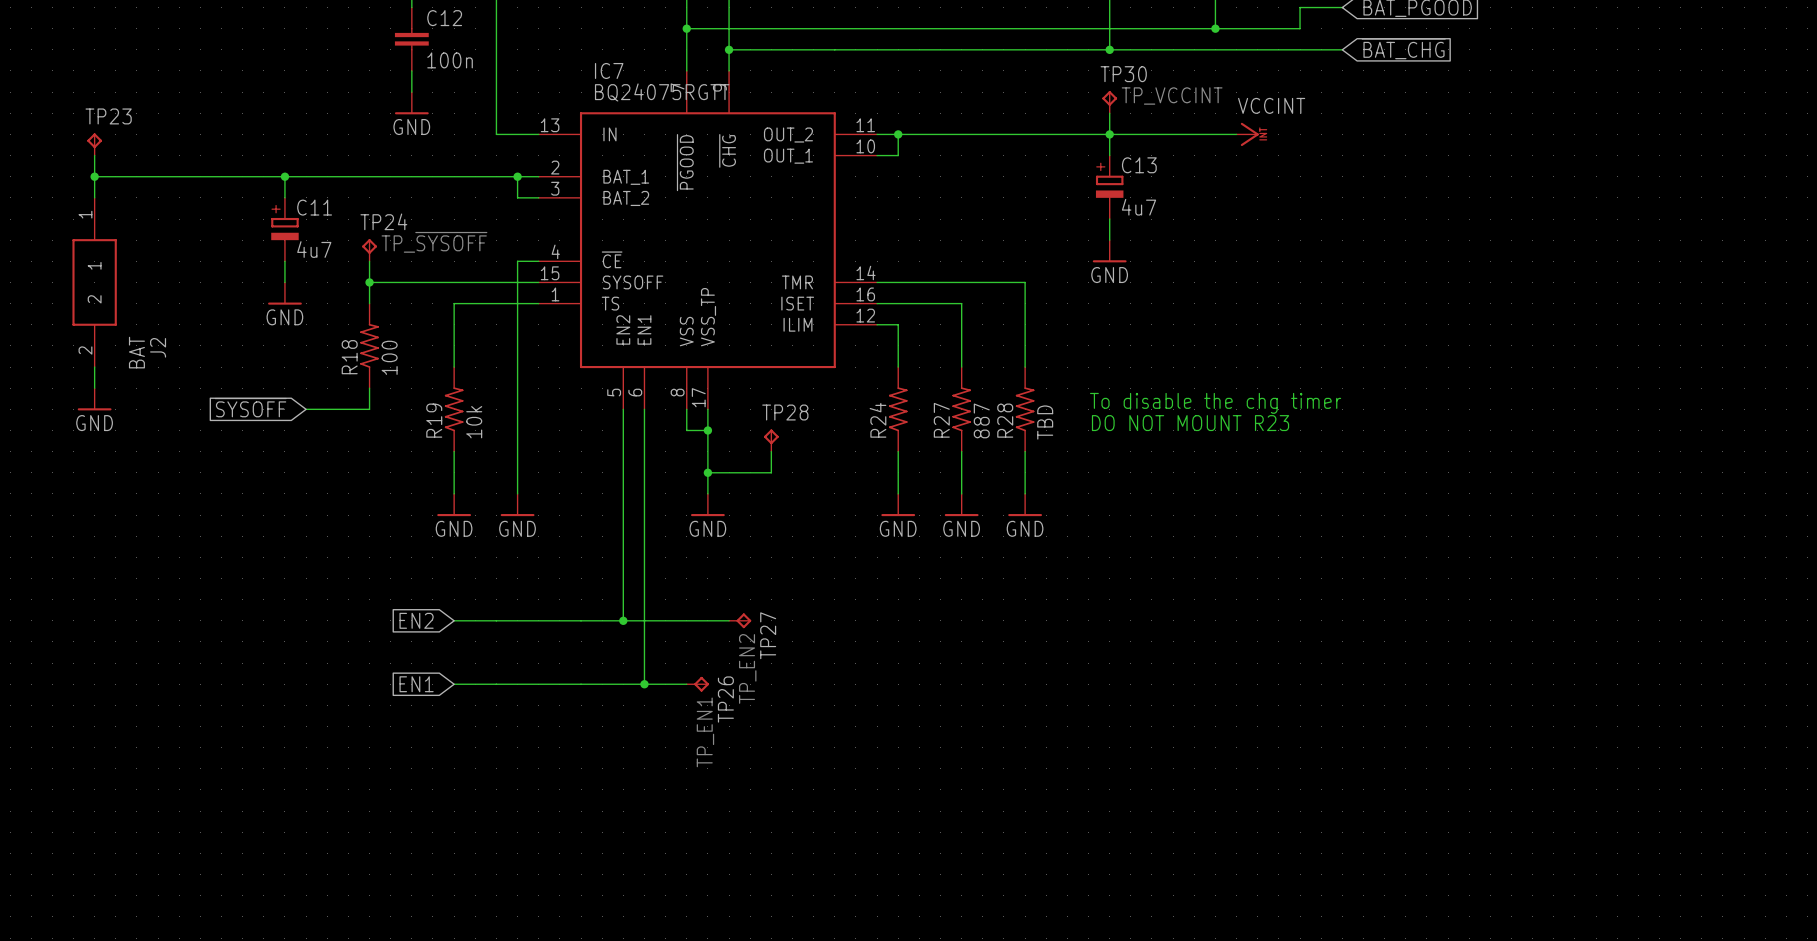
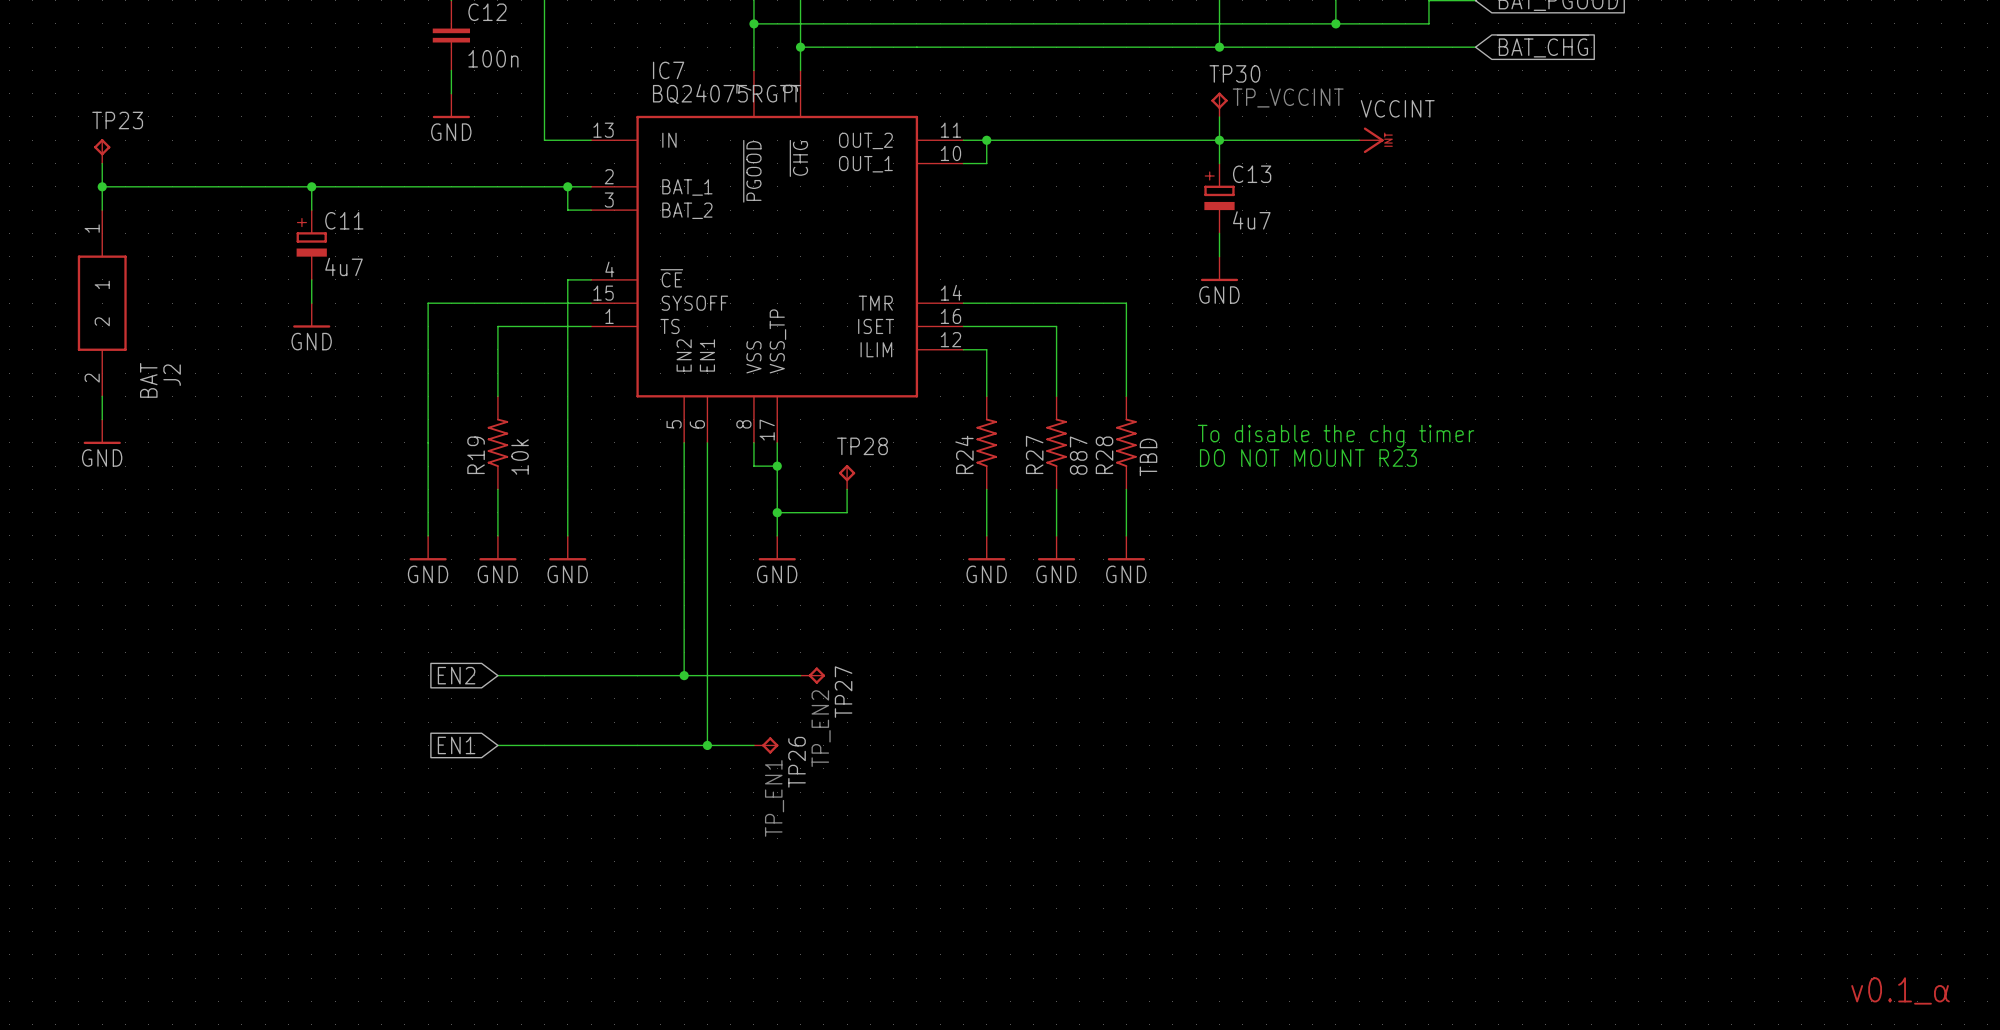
TP24: (369, 250) -> none
wire: (369, 261) (369, 303) -> none
wire: (369, 282) (390, 282) -> (428, 535) (428, 303)
junction: (369, 282) -> none
R18: 100 (369, 345) -> none
wire: (369, 388) (369, 409) (306, 409) -> none
global label: ~{SYSOFF} (250, 407) -> none
power symbol: none -> GND (428, 548)
text: none -> v0.1_α (1900, 990)

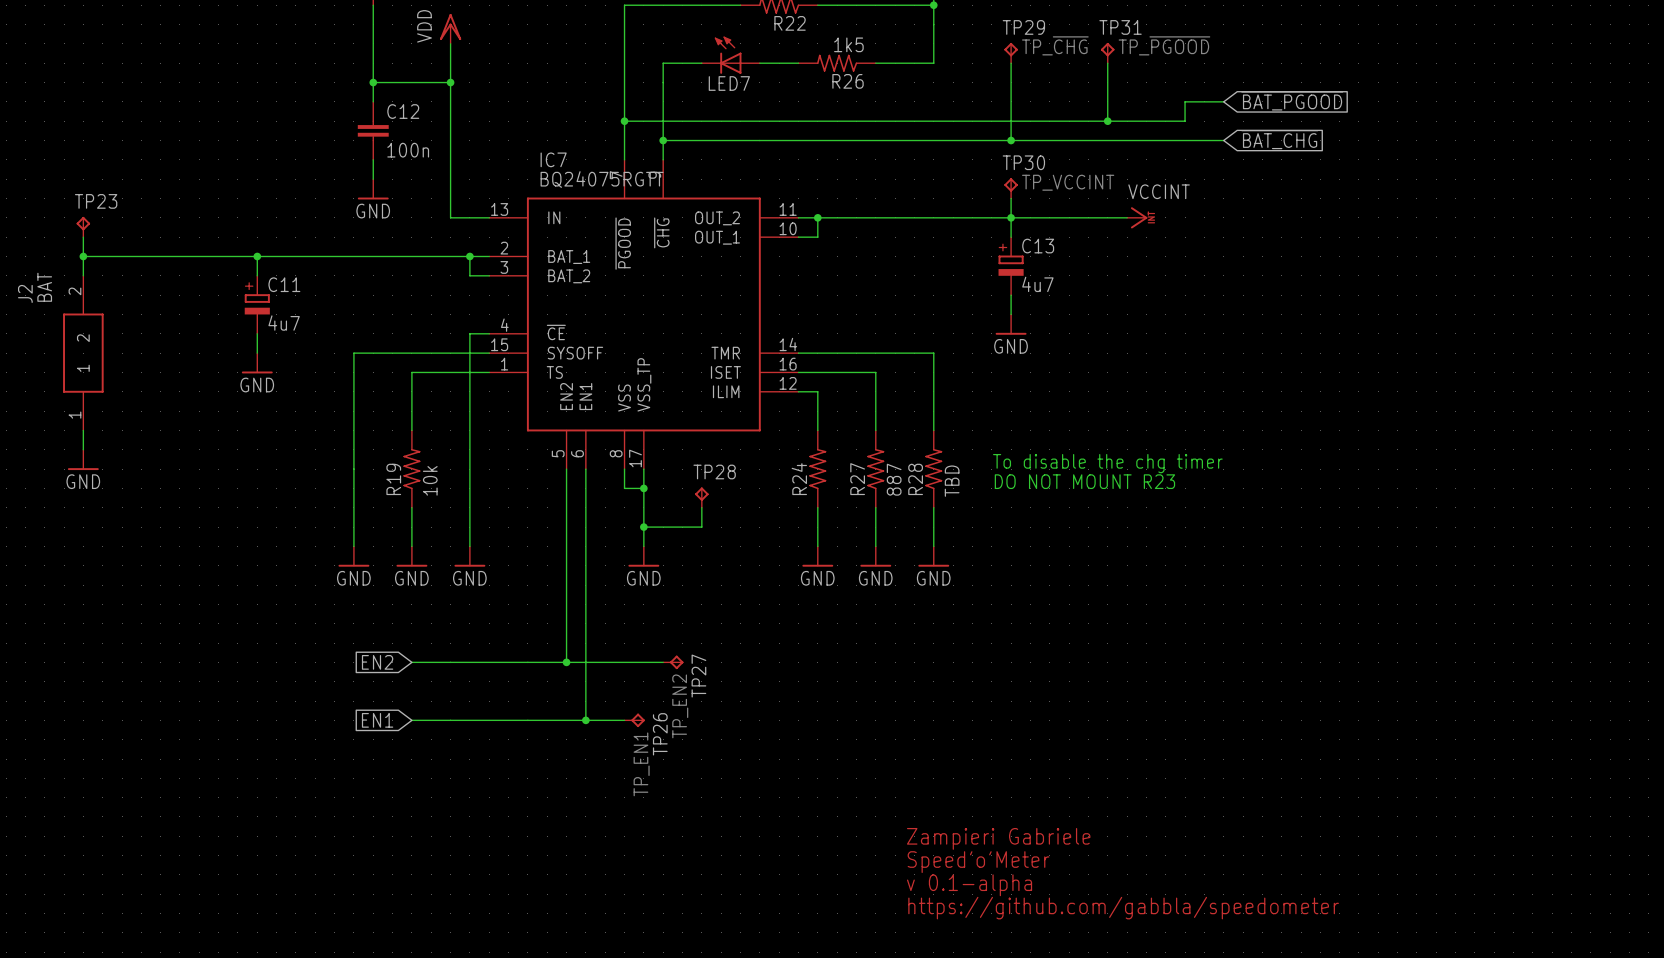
J2 rotation: 0° (102, 303) -> 180° (83, 353)
text: none -> Zampieri Gabriele (998, 838)
text: none -> Speed'o'Meter (978, 862)
text: none -> v 0.1-alpha (969, 885)
text: none -> https://github.com/gabbla/speedometer (1123, 908)
text: v0.1_α (1900, 990) -> none

